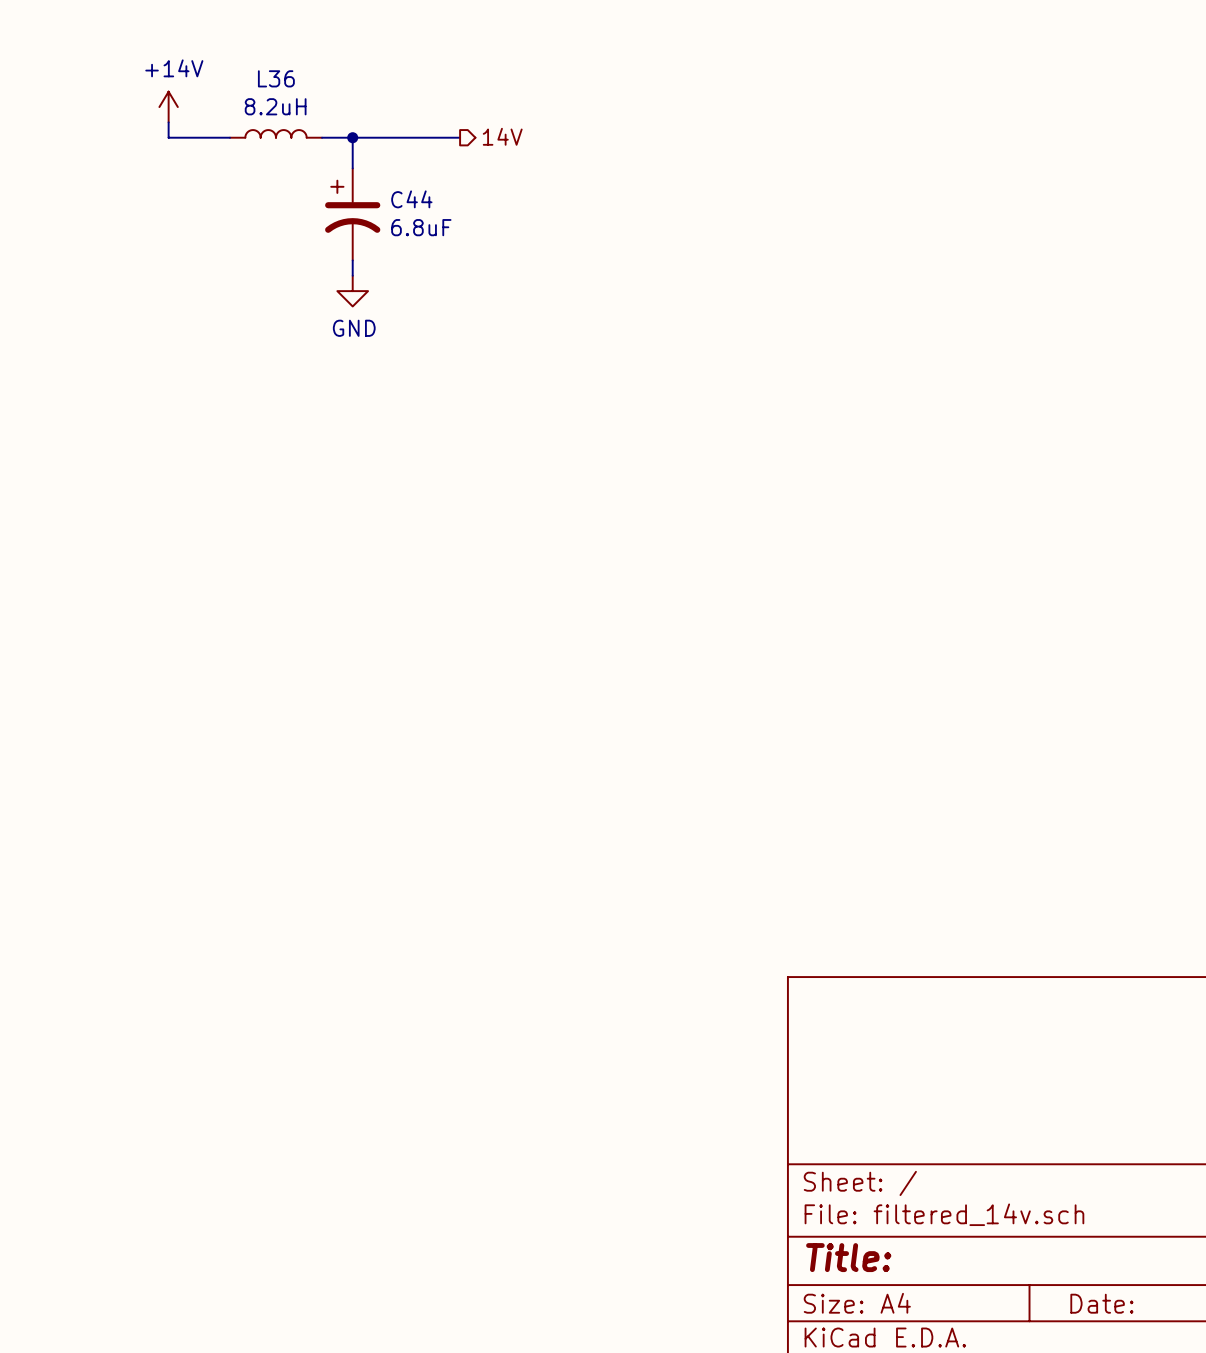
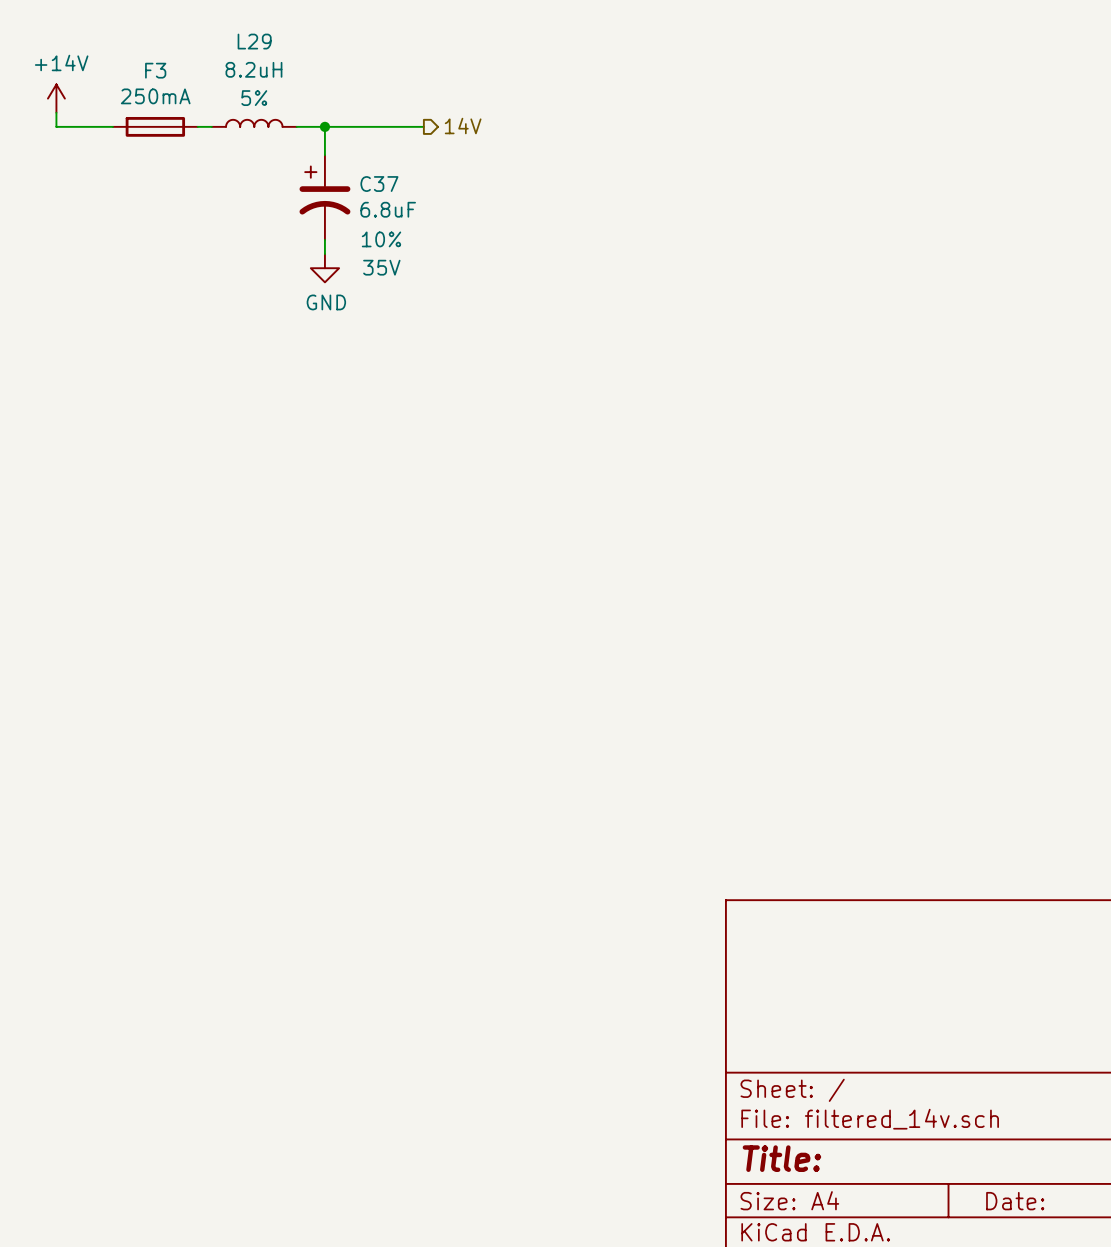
L36 name: L36 (276, 78) -> L29 (254, 41)
L36 value position: 8.2uH (275, 106) -> 8.2uH (253, 69)
L36 text: none -> 5% (254, 98)
power symbol position: +14V (168, 107) -> +14V (56, 98)
wire: none -> (56, 112) (56, 126) (112, 126)
F3: none -> 250mA (155, 126)
C44 name: C44 (411, 199) -> C37 (379, 184)
C44 text: none -> 10% (381, 239)
C44 text: none -> 35V (381, 267)

